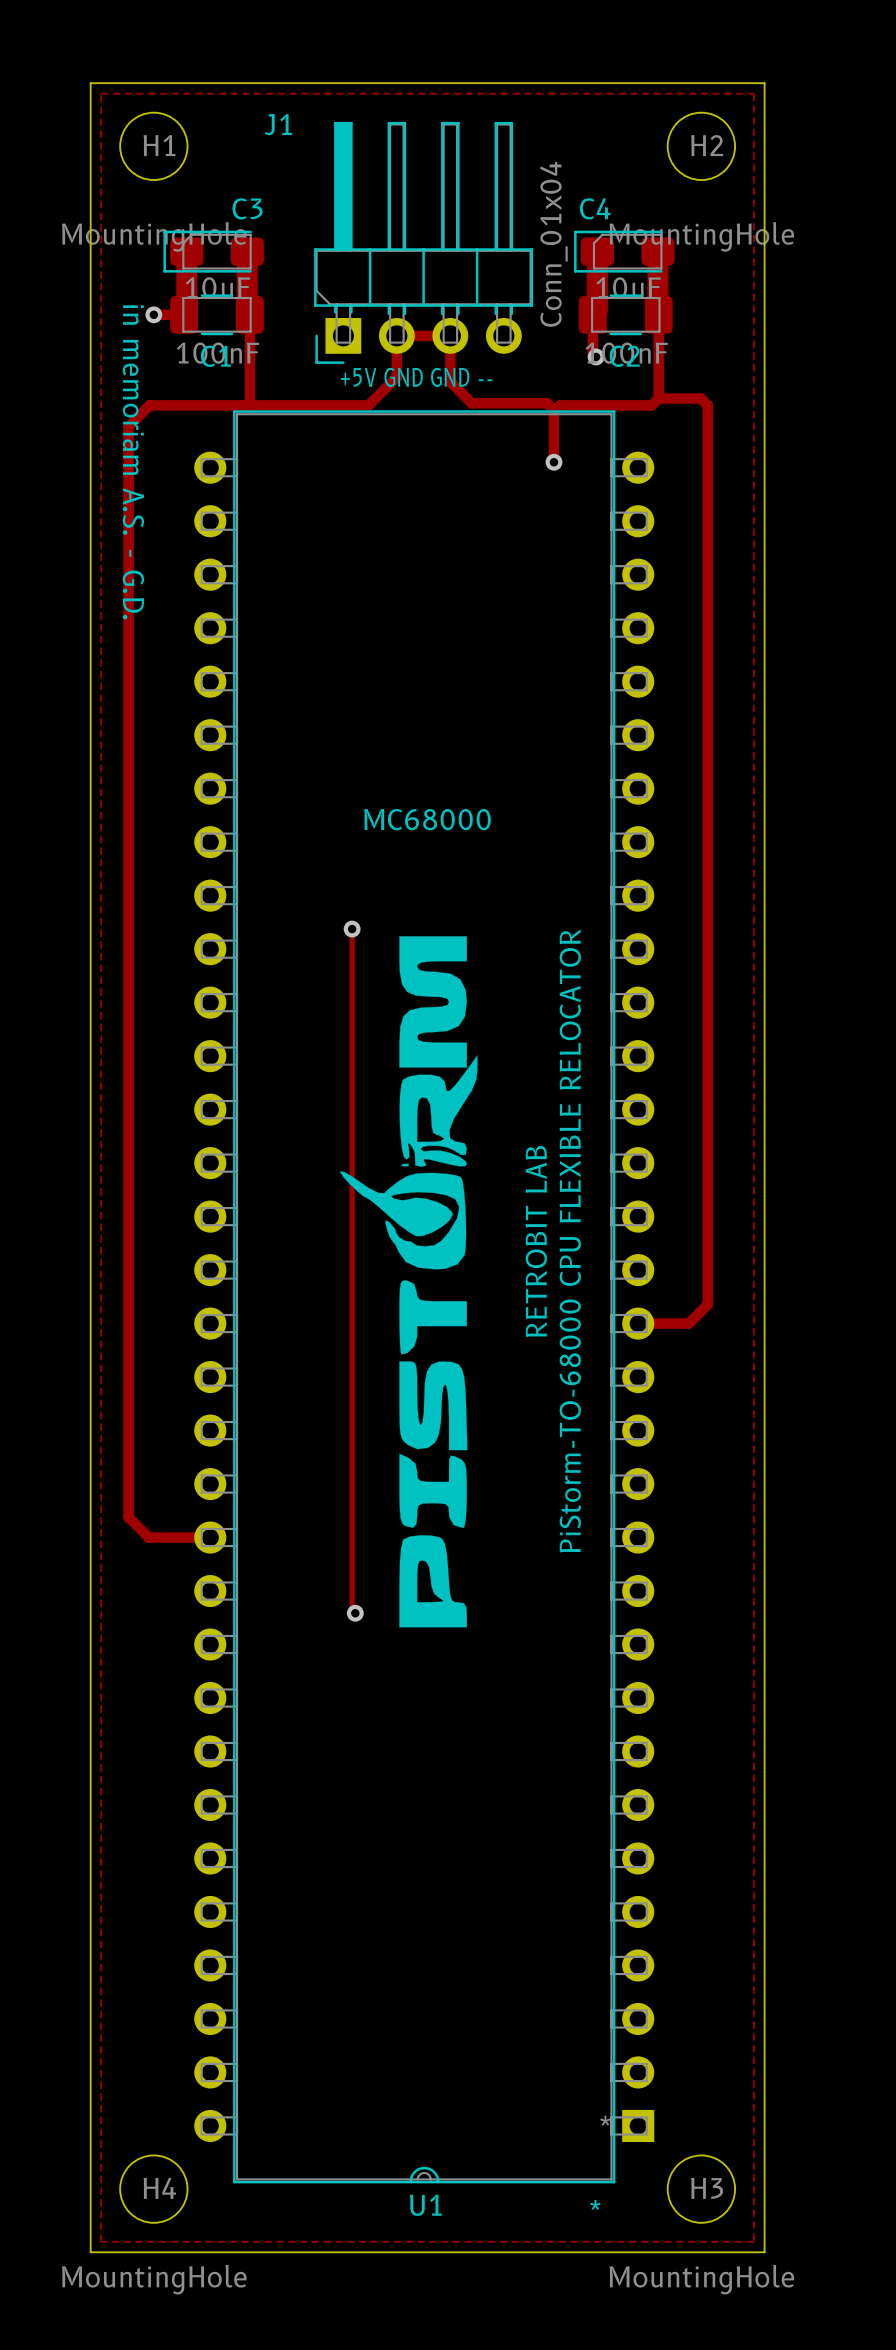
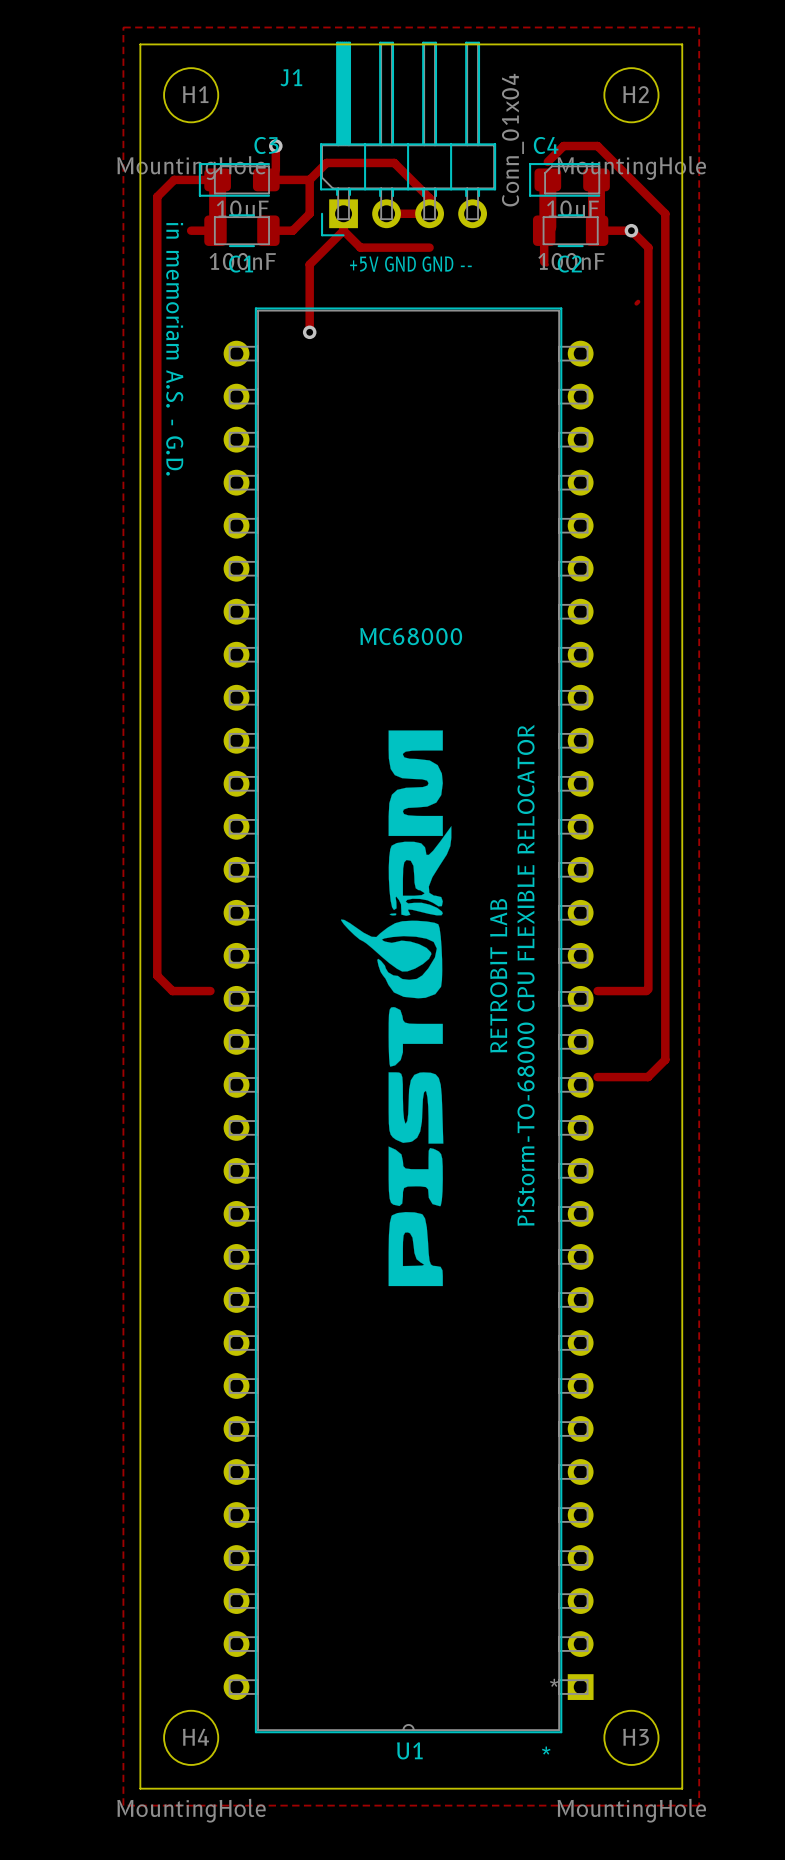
zone outline: (101, 93) (101, 2241) (754, 2241) (754, 93) (101, 93) -> (123, 27) (123, 1805) (699, 1805) (699, 27) (123, 27)
track: none -> (275, 146) (275, 170) (266, 179) (309, 179)
via: none -> (275, 146)
track: none -> (547, 161) (563, 146) (597, 146) (665, 213) (665, 1059) (648, 1077) (597, 1077)
J1 position: (423, 242) -> (408, 139)
track: none -> (217, 179) (174, 179) (157, 196) (157, 975) (172, 991) (210, 991)
track: (247, 251) (247, 312) (249, 314) (249, 399) (244, 405) -> none
track: none -> (309, 179) (309, 213) (292, 230) (268, 230)
track: none -> (309, 179) (326, 162) (394, 162) (429, 198) (429, 213) (386, 213)
via: (153, 314) -> none
track: none -> (343, 230) (309, 264) (309, 332)
track: (657, 314) (658, 398) -> (596, 230) (631, 230) (648, 247) (648, 989) (646, 991) (597, 991)
via: none -> (631, 230)
track: (396, 335) (396, 377) (368, 405) (149, 405) (128, 426) (128, 1517) (148, 1537) (210, 1537) -> (386, 247) (360, 247) (343, 230)
track: (450, 335) (450, 381) (471, 403) -> none
via: (596, 356) -> none
text position: +5V GND GND -- (416, 377) -> +5V GND GND -- (410, 264)
track: (658, 398) (651, 405) (560, 405) (553, 410) -> none
track: (658, 398) (700, 398) (707, 405) (707, 1304) (688, 1323) (638, 1323) -> none
track: (471, 403) (547, 403) (553, 410) -> none
track: (553, 410) (553, 462) -> none
via: none -> (309, 332)
via: (553, 462) -> none
track: (352, 929) (352, 1610) (355, 1613) -> none
via: (352, 929) -> none
via: (355, 1613) -> none
line: (410, 2181) (414, 2172) (424, 2168) (434, 2172) (438, 2181) -> none

